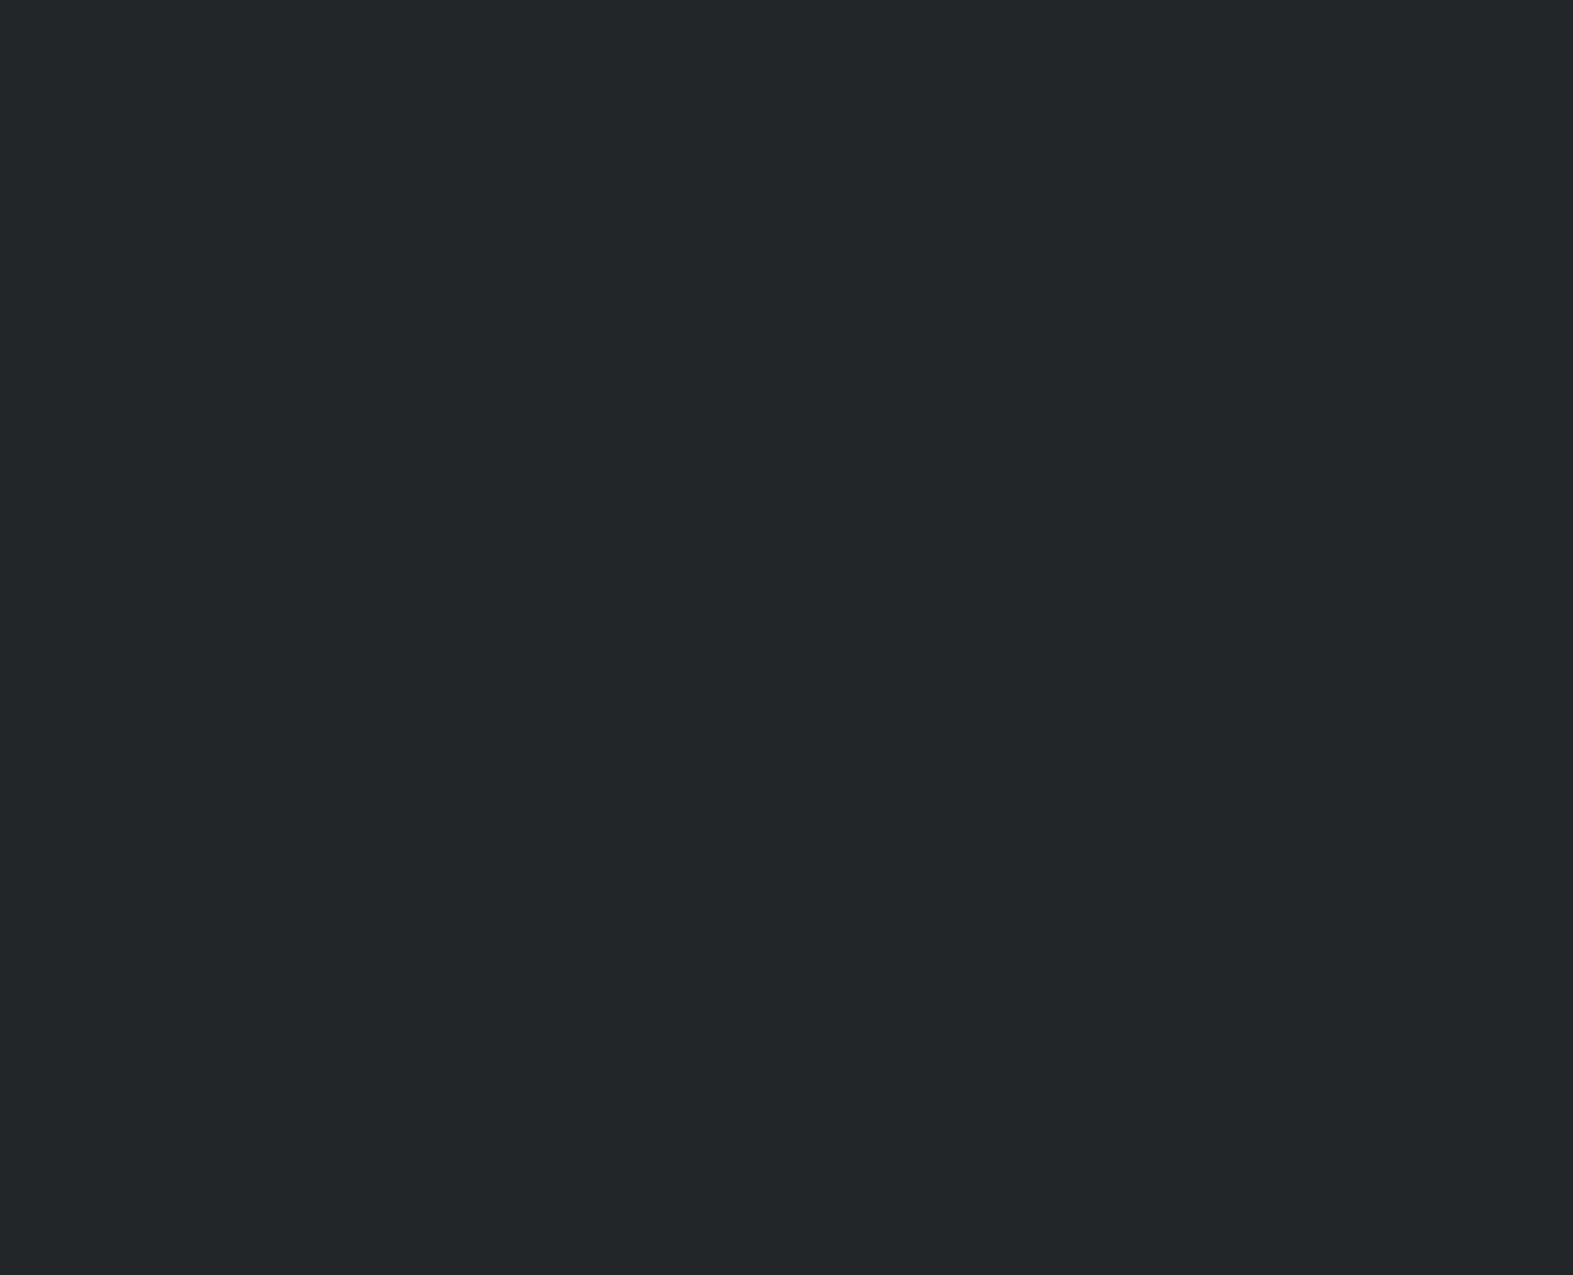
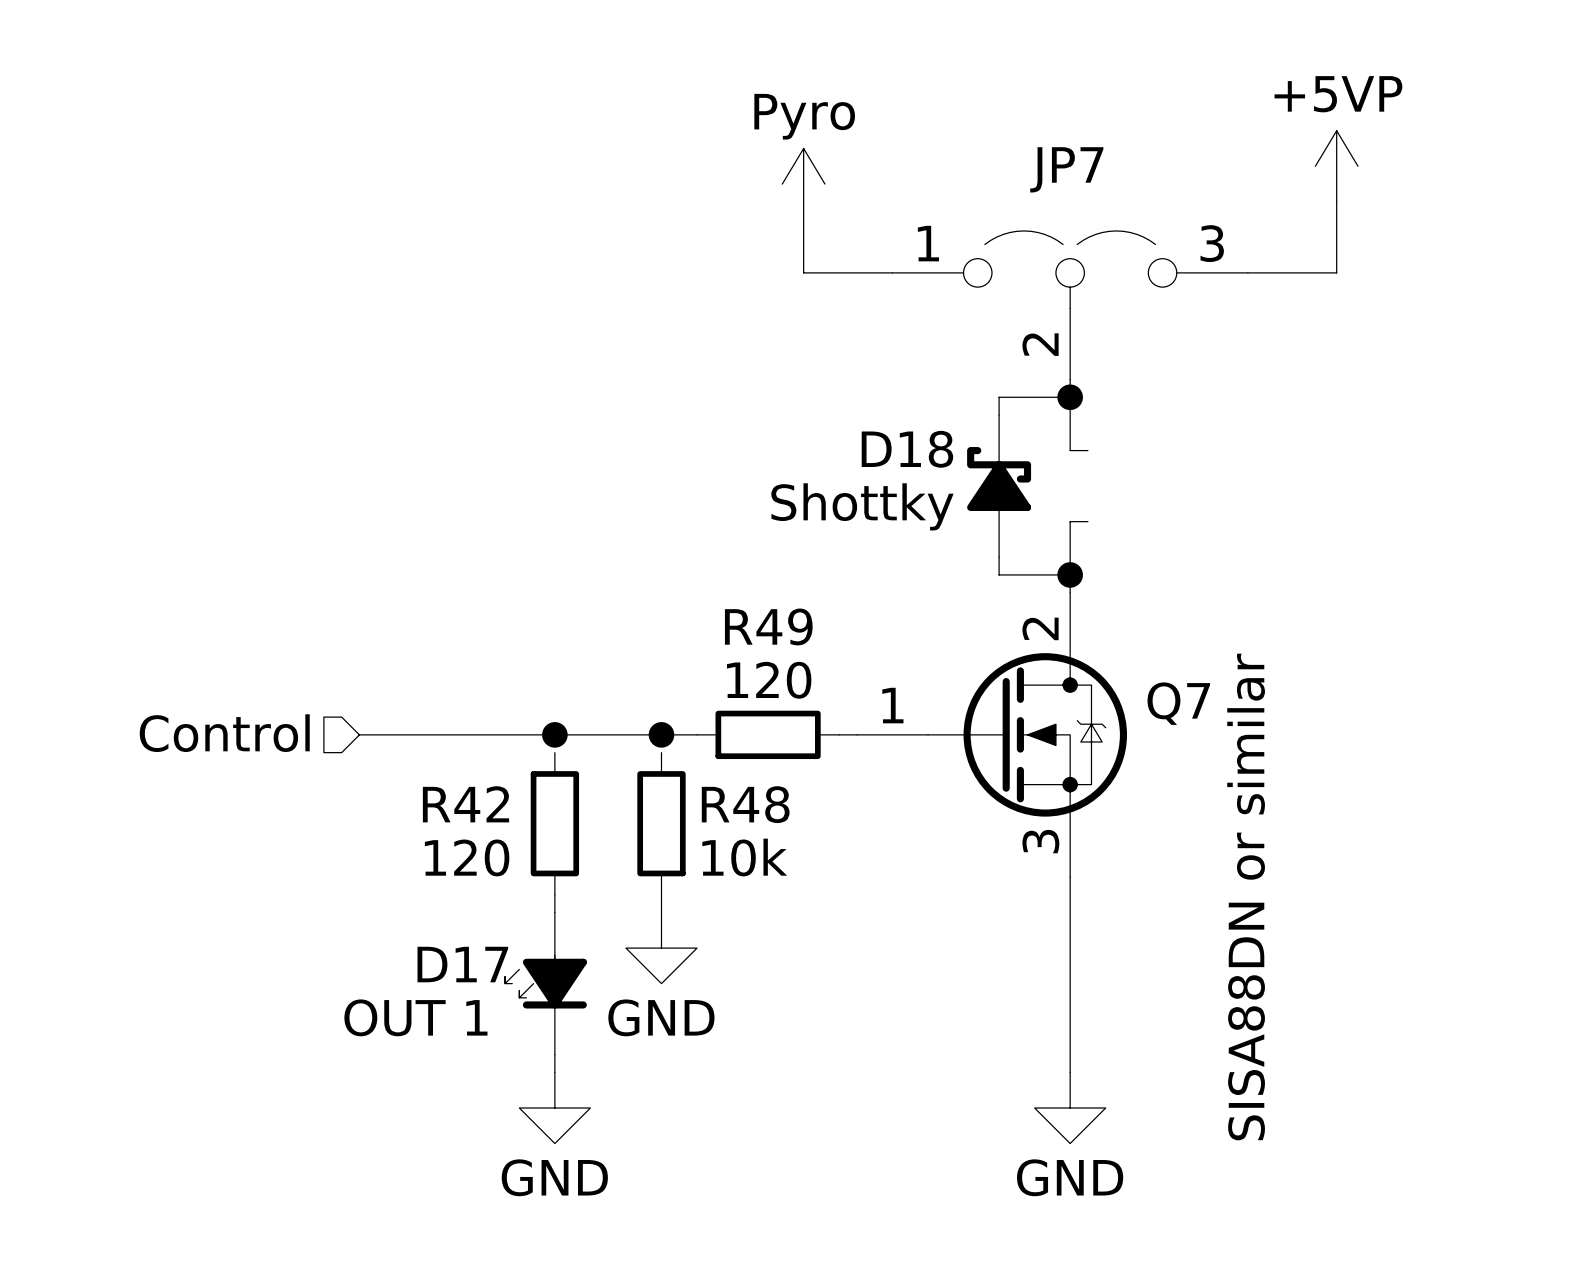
power symbol: none -> +5VP (1336, 166)
power symbol: none -> Pyro (803, 184)
wire: none -> (1336, 201) (1336, 272) (1247, 272)
wire: none -> (803, 219) (803, 272) (892, 272)
JP7: none -> (1070, 305)
wire: none -> (1070, 379) (1070, 450) (1087, 450)
wire: none -> (1070, 397) (999, 397) (999, 415)
junction: none -> (1070, 397)
D18: none -> Shottky (999, 486)
wire: none -> (1087, 521) (1070, 521) (1070, 592)
wire: none -> (999, 557) (999, 574) (1070, 574)
junction: none -> (1070, 574)
hierarchical label: none -> Control (224, 733)
wire: none -> (359, 734) (697, 734)
junction: none -> (554, 734)
junction: none -> (661, 734)
R49: none -> 120 (768, 734)
wire: none -> (839, 734) (856, 734)
Q7: none -> SISA88DN or similar (991, 734)
R42: none -> 120 (554, 823)
R48: none -> 10k (661, 823)
wire: none -> (1070, 877) (1070, 1072)
wire: none -> (554, 894) (554, 912)
wire: none -> (661, 894) (661, 912)
power symbol: none -> GND (661, 948)
D17: none -> OUT 1 (545, 983)
wire: none -> (554, 1054) (554, 1072)
power symbol: none -> GND (554, 1108)
power symbol: none -> GND (1070, 1108)

